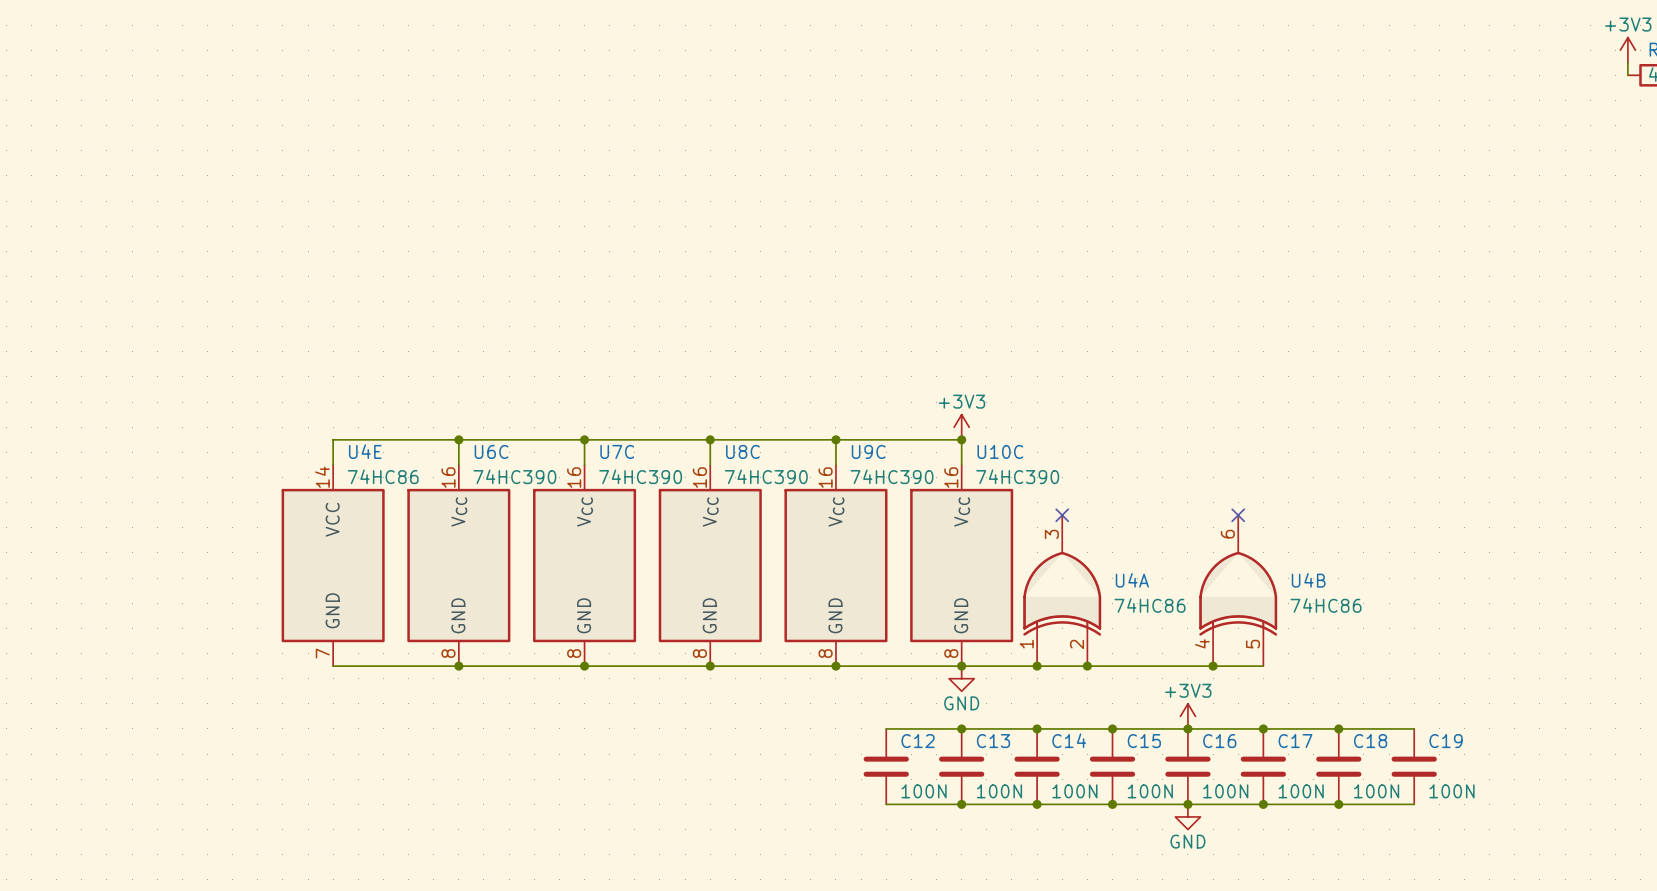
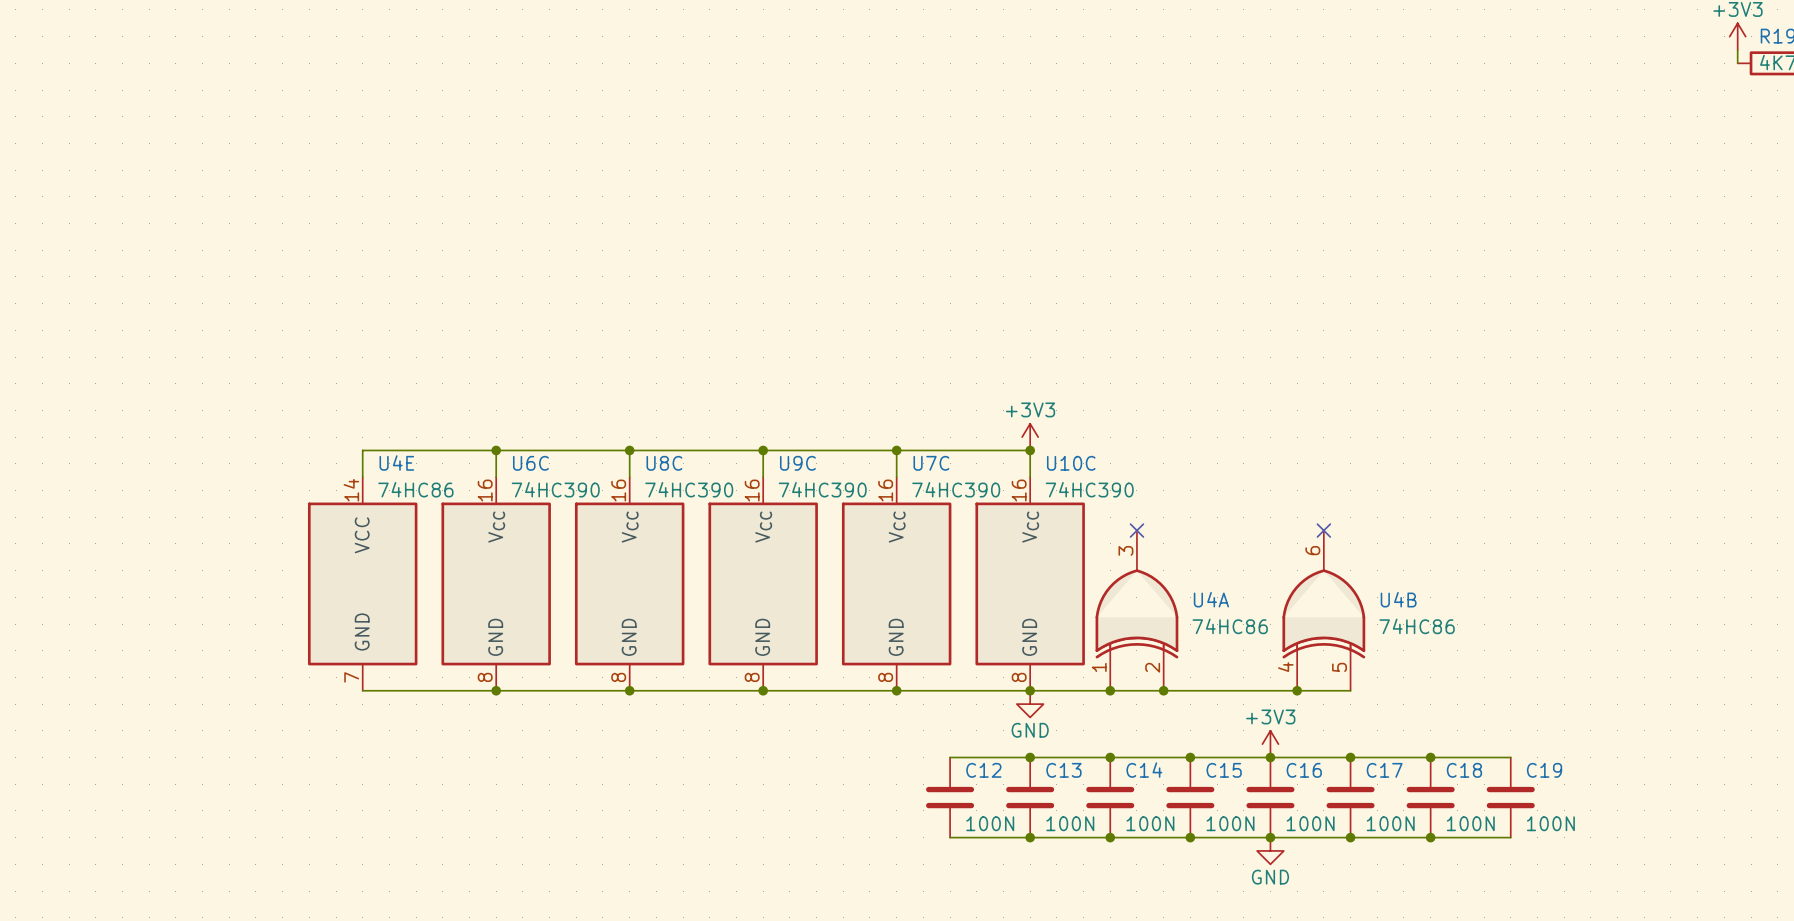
U7C name: U7C (617, 451) -> U8C (664, 463)
U8C name: U8C (742, 451) -> U9C (797, 463)
U9C name: U9C (868, 451) -> U7C (931, 463)

